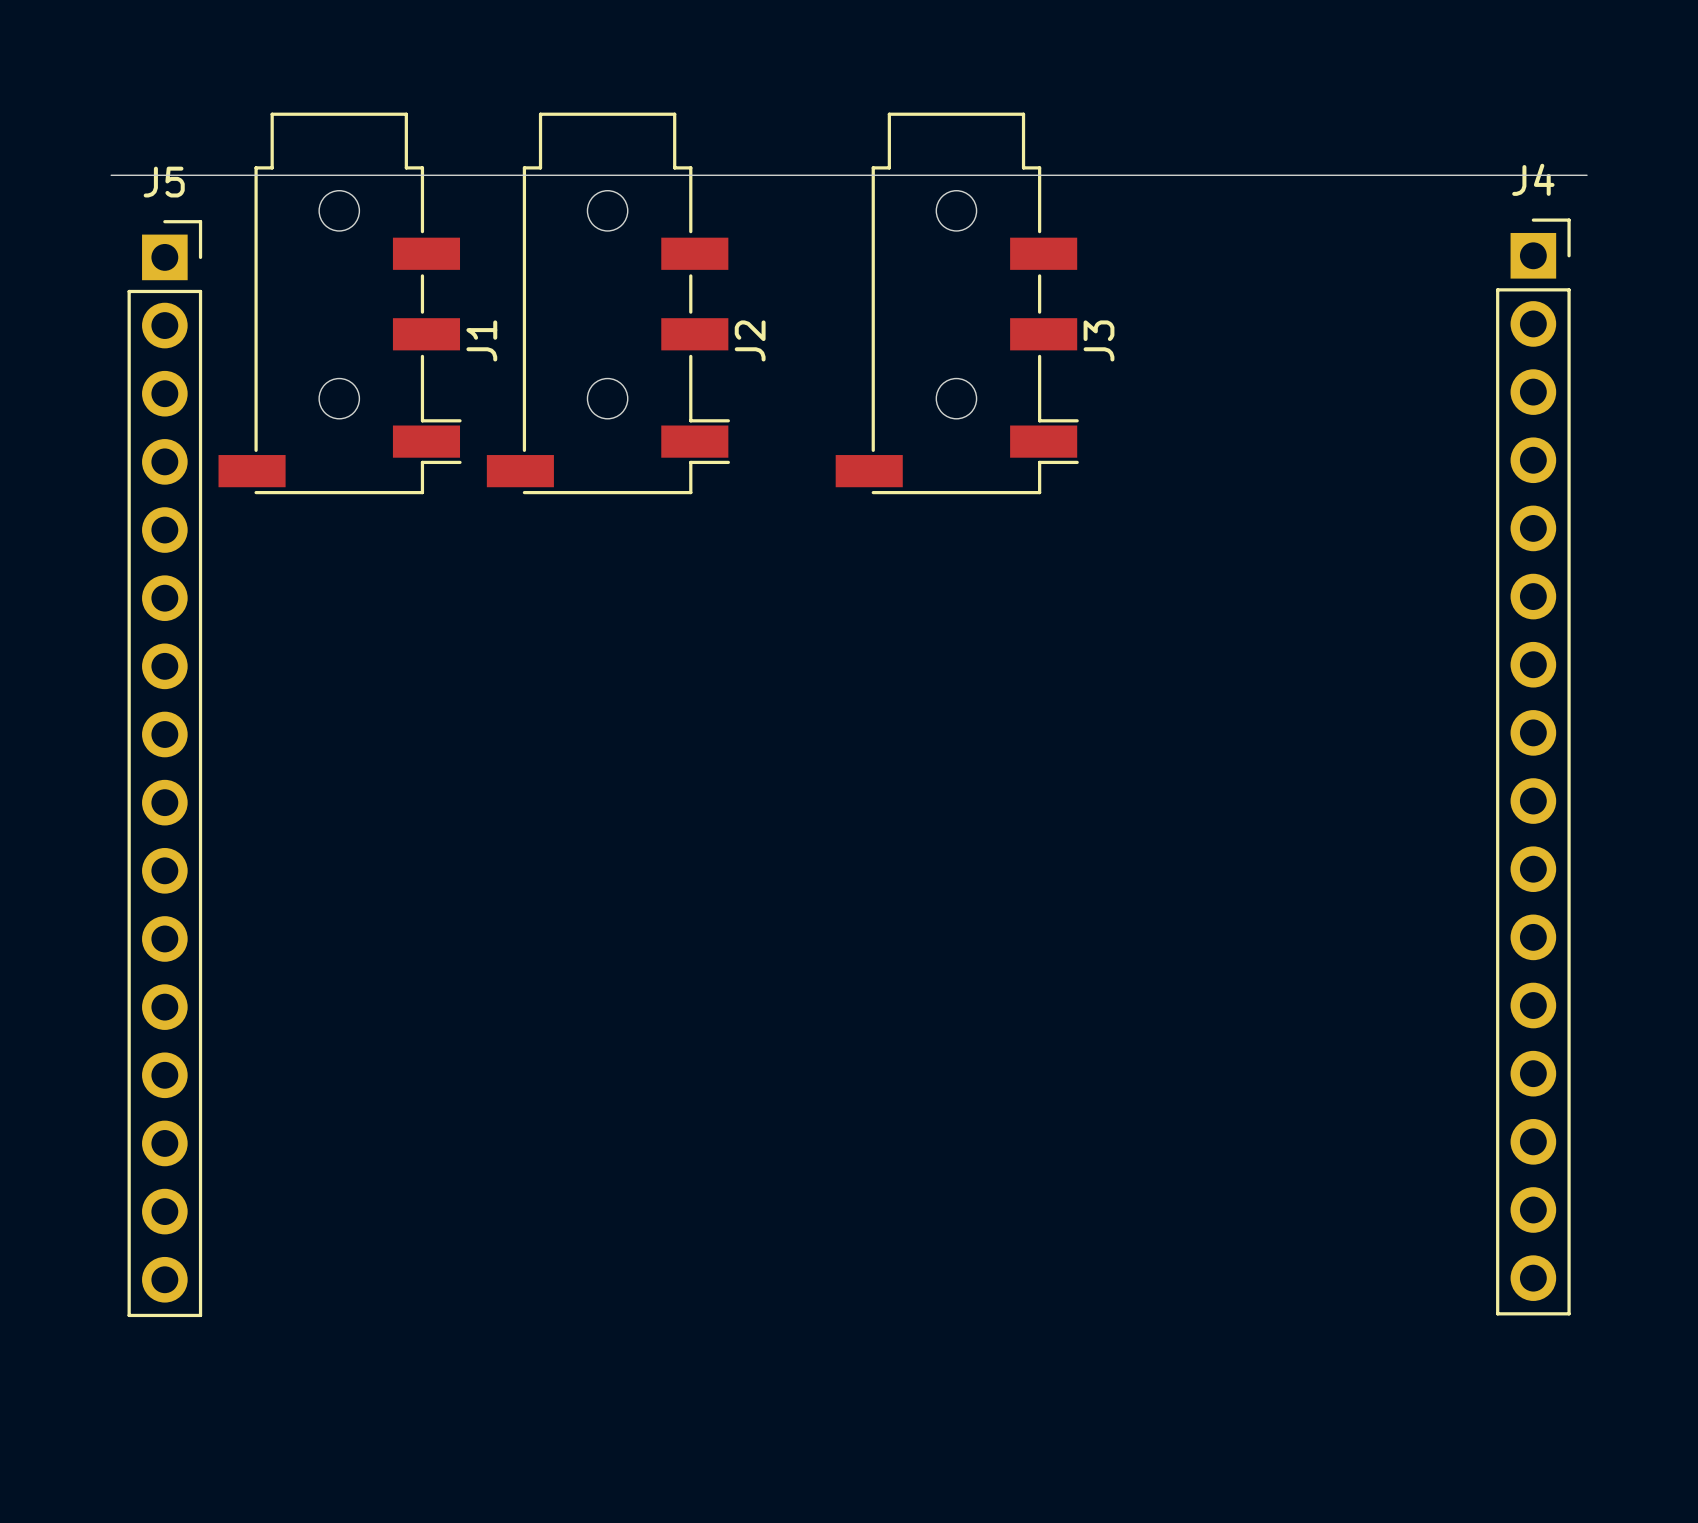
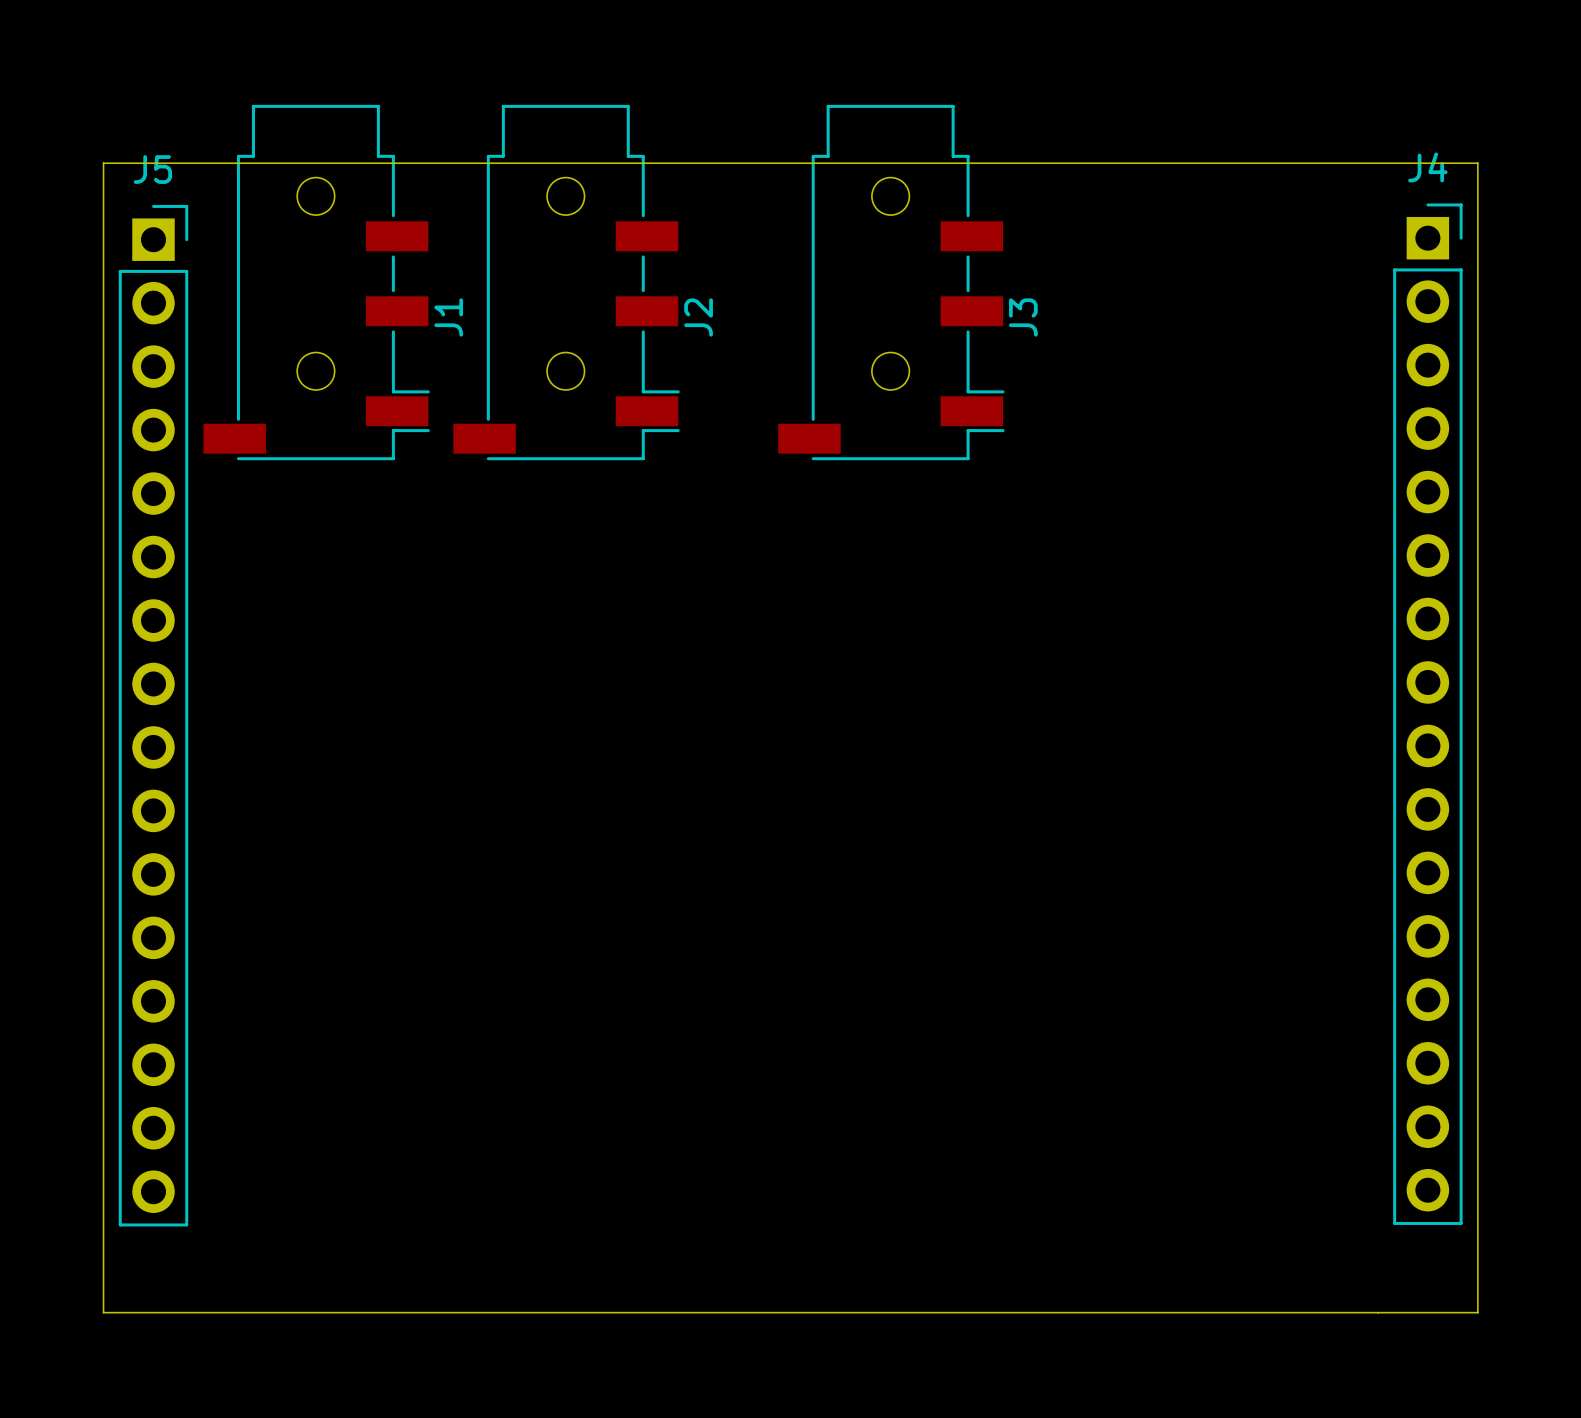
board edge: none -> (103, 163) (103, 1312) (1477, 1312) (1477, 163)

